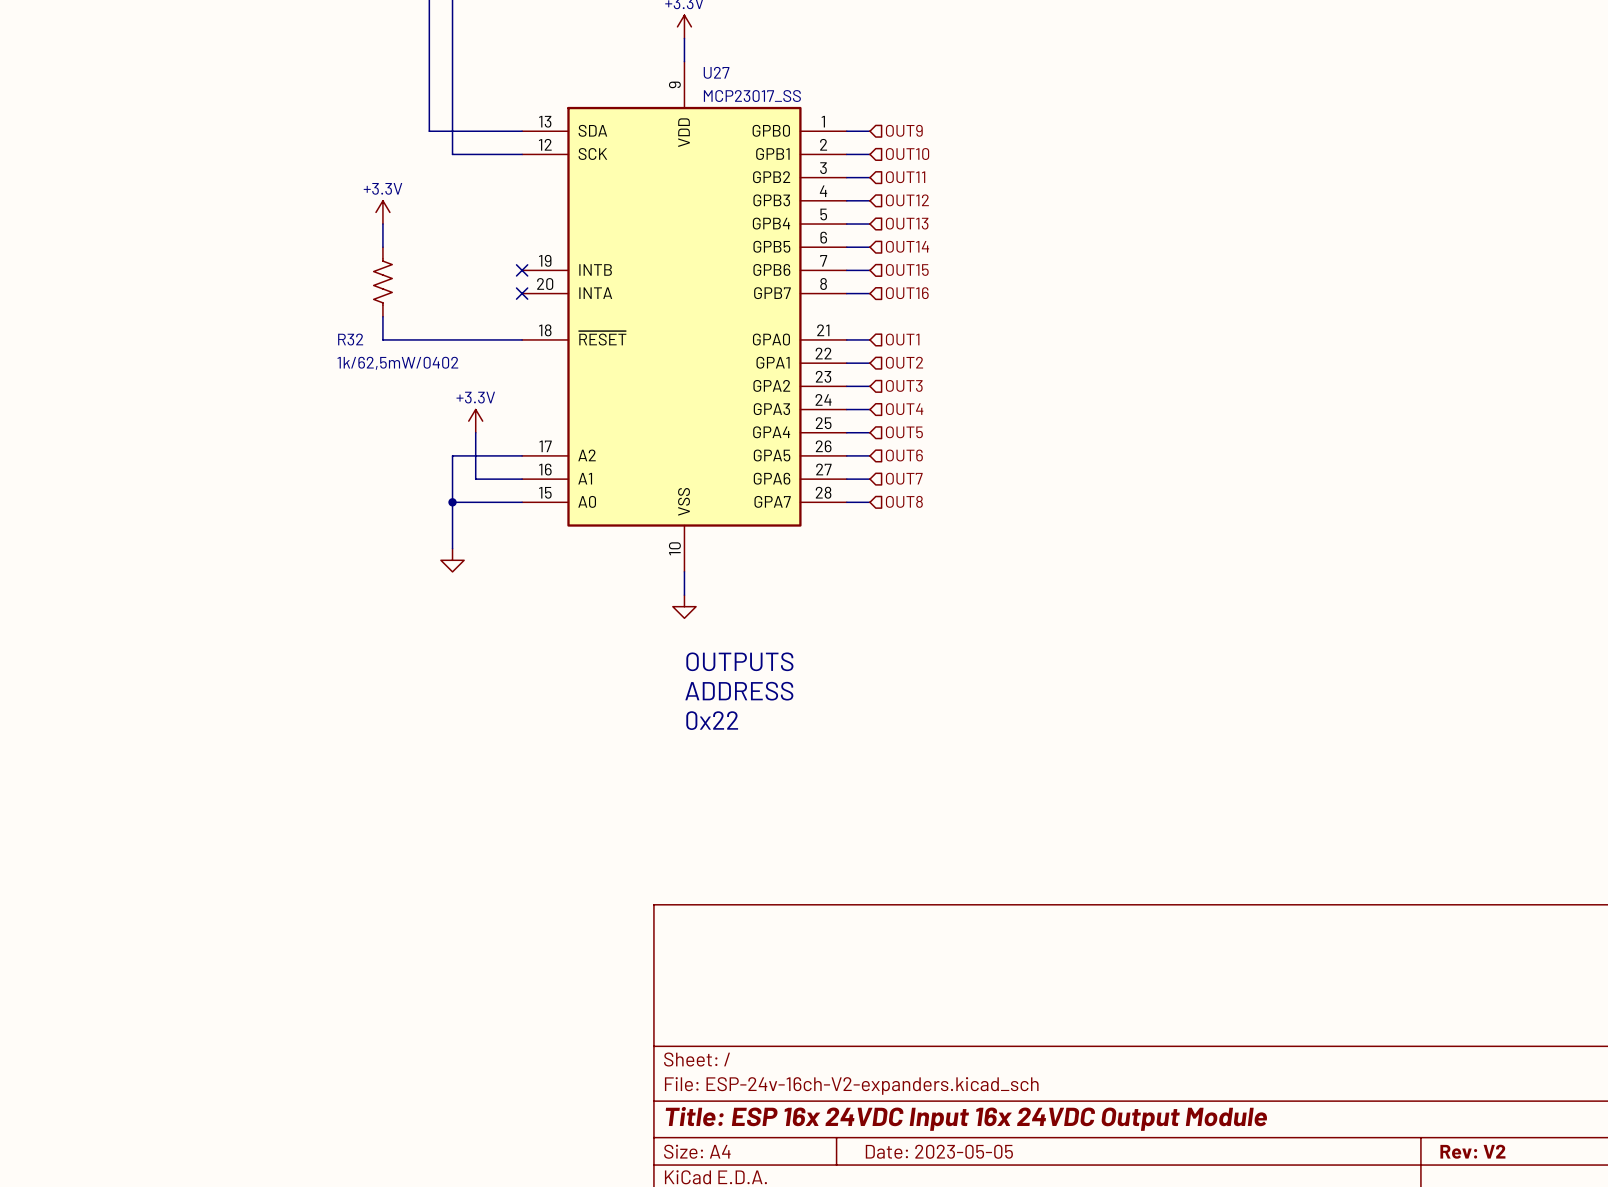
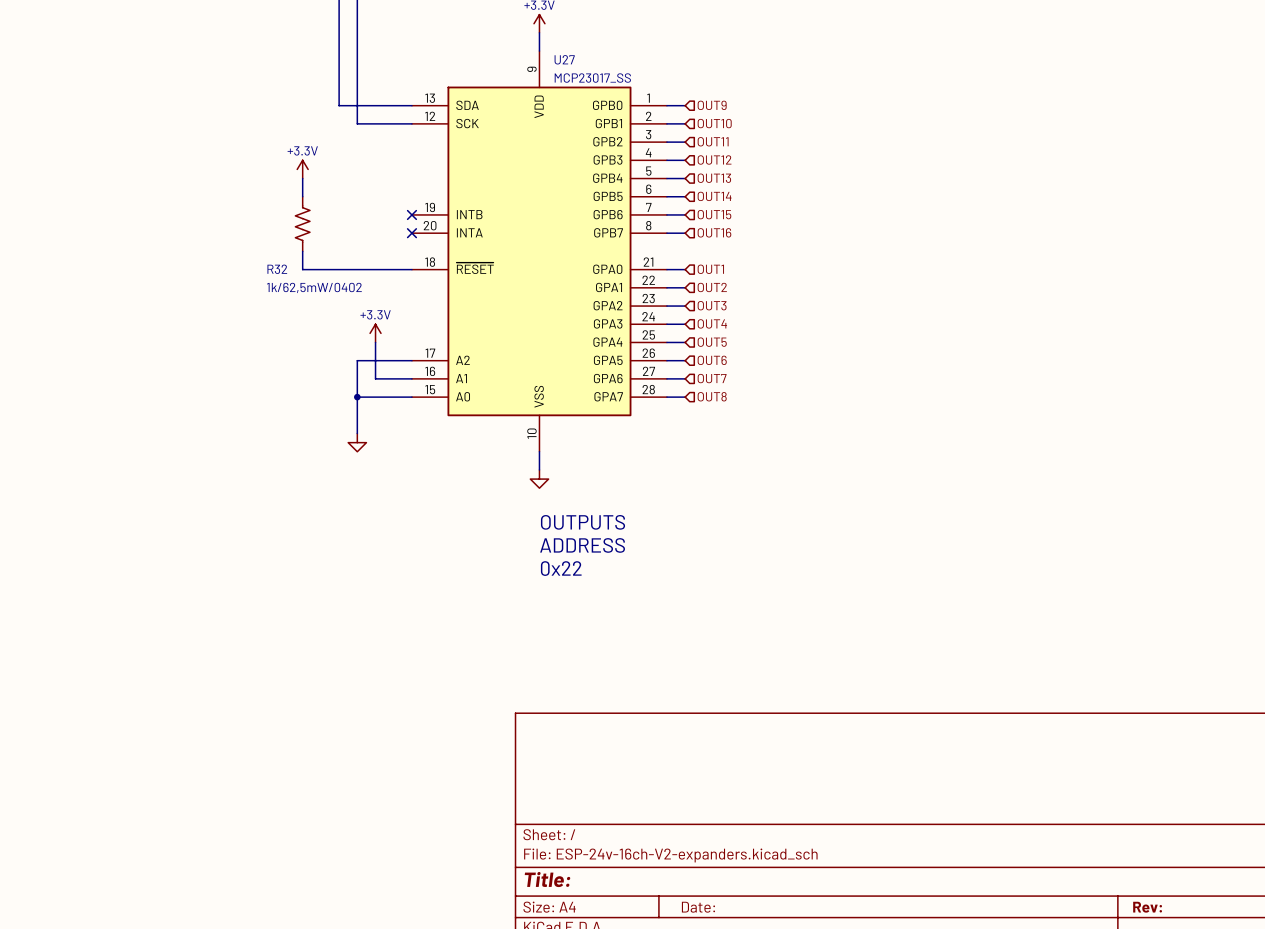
title block: Title: ESP 16x 24VDC Input 16x 24VDC Output Module (966, 1118) -> Title: (547, 879)
title block: Date: 2023-05-05 (939, 1151) -> Date: (698, 907)
title block: Rev: V2 (1472, 1151) -> Rev: (1147, 907)

